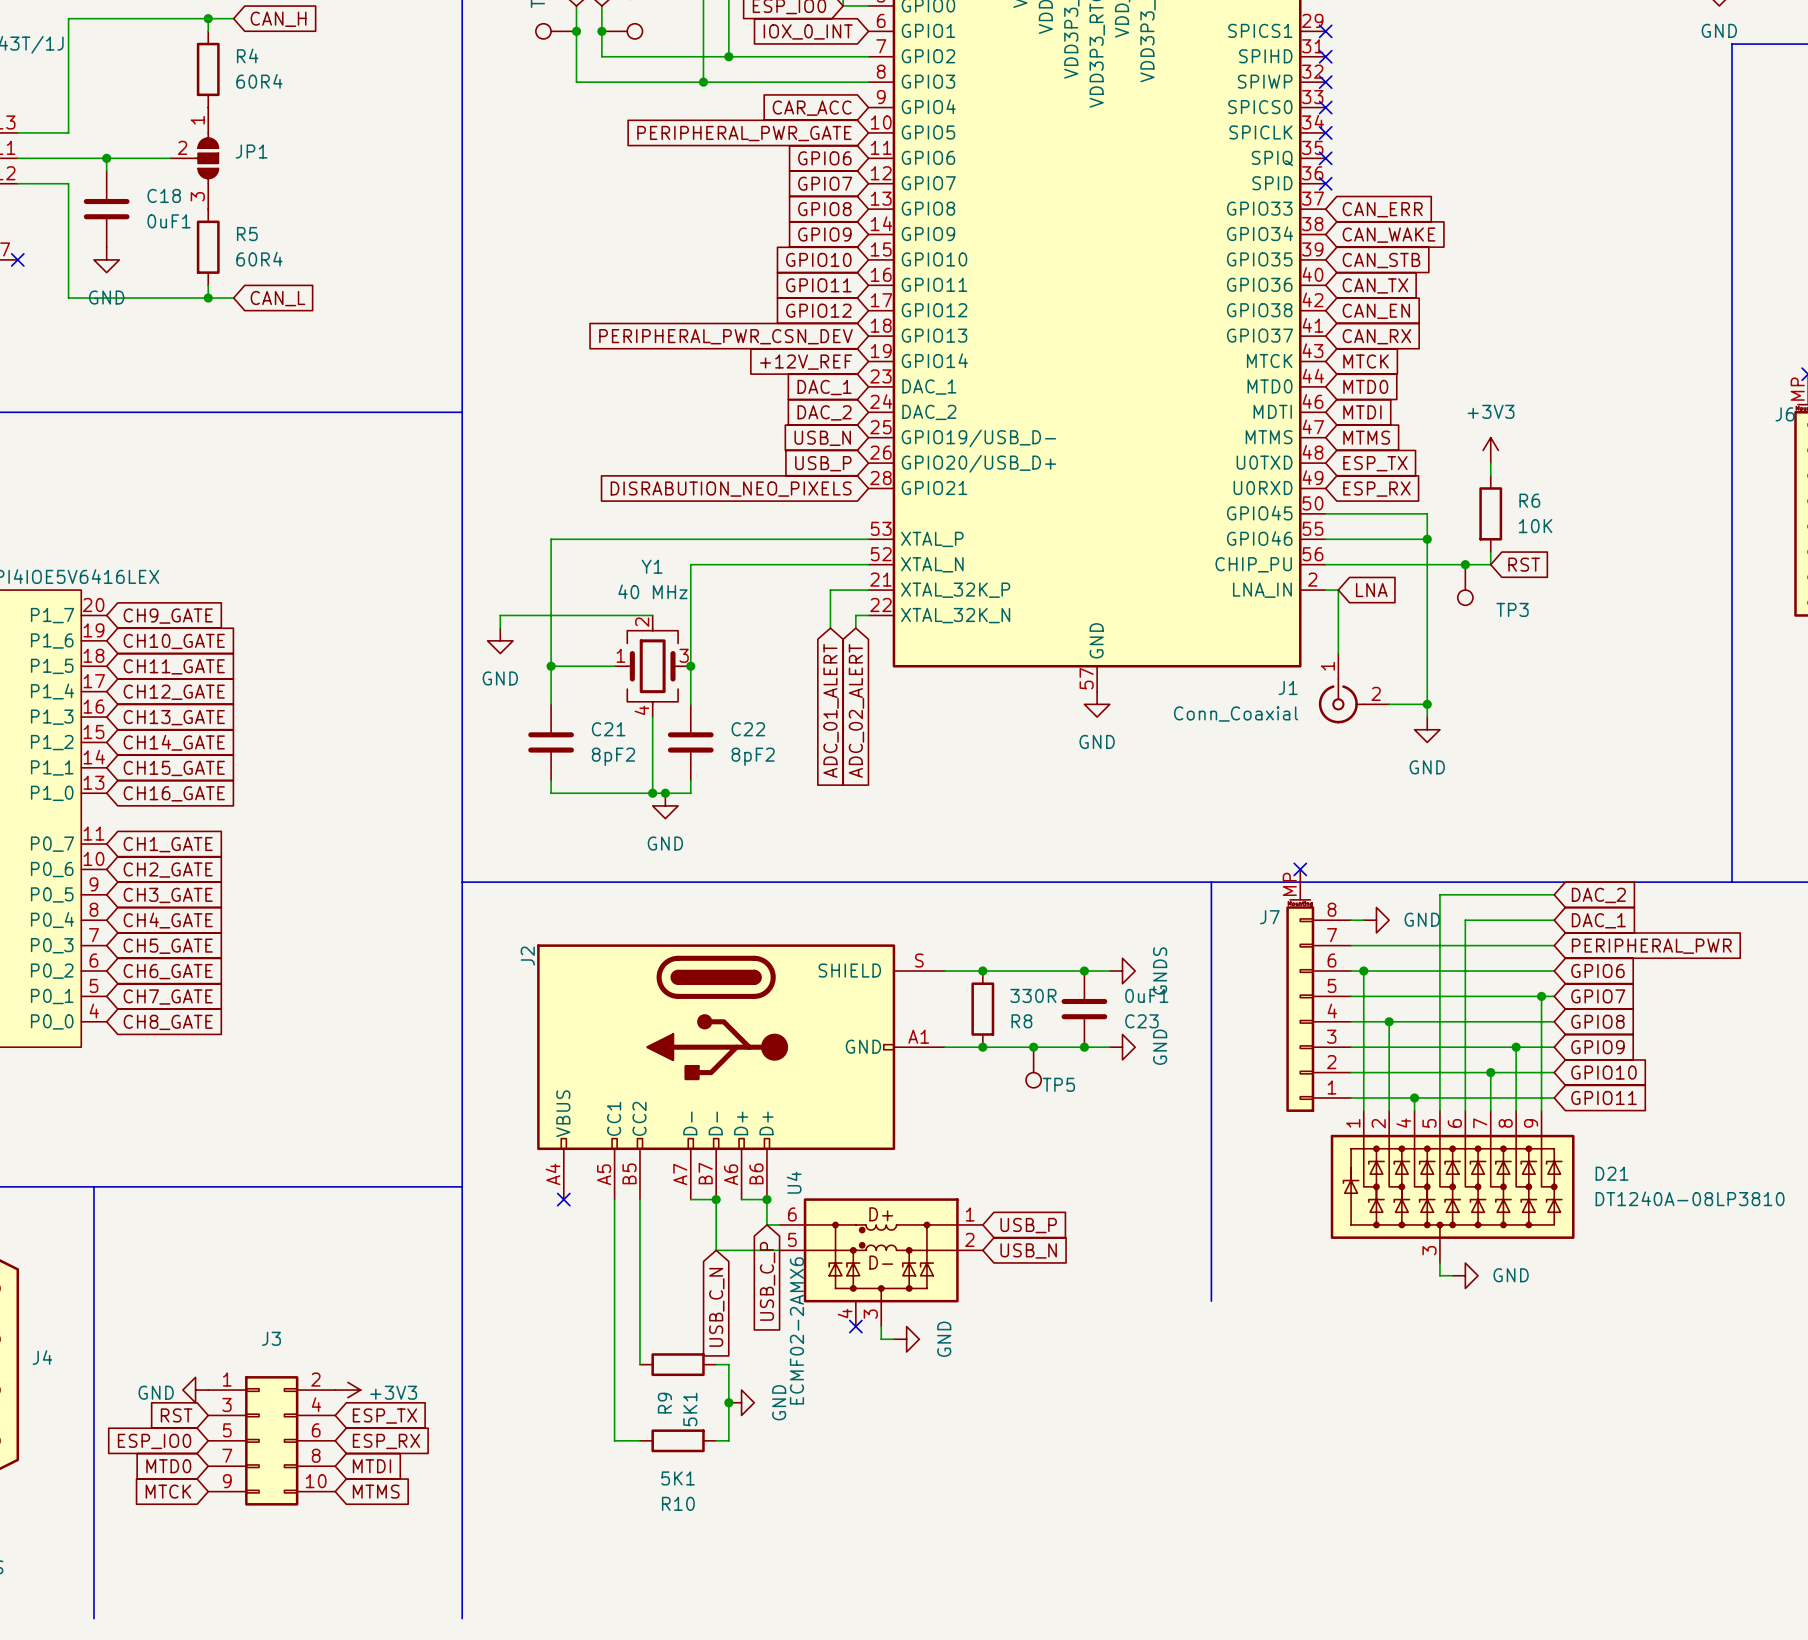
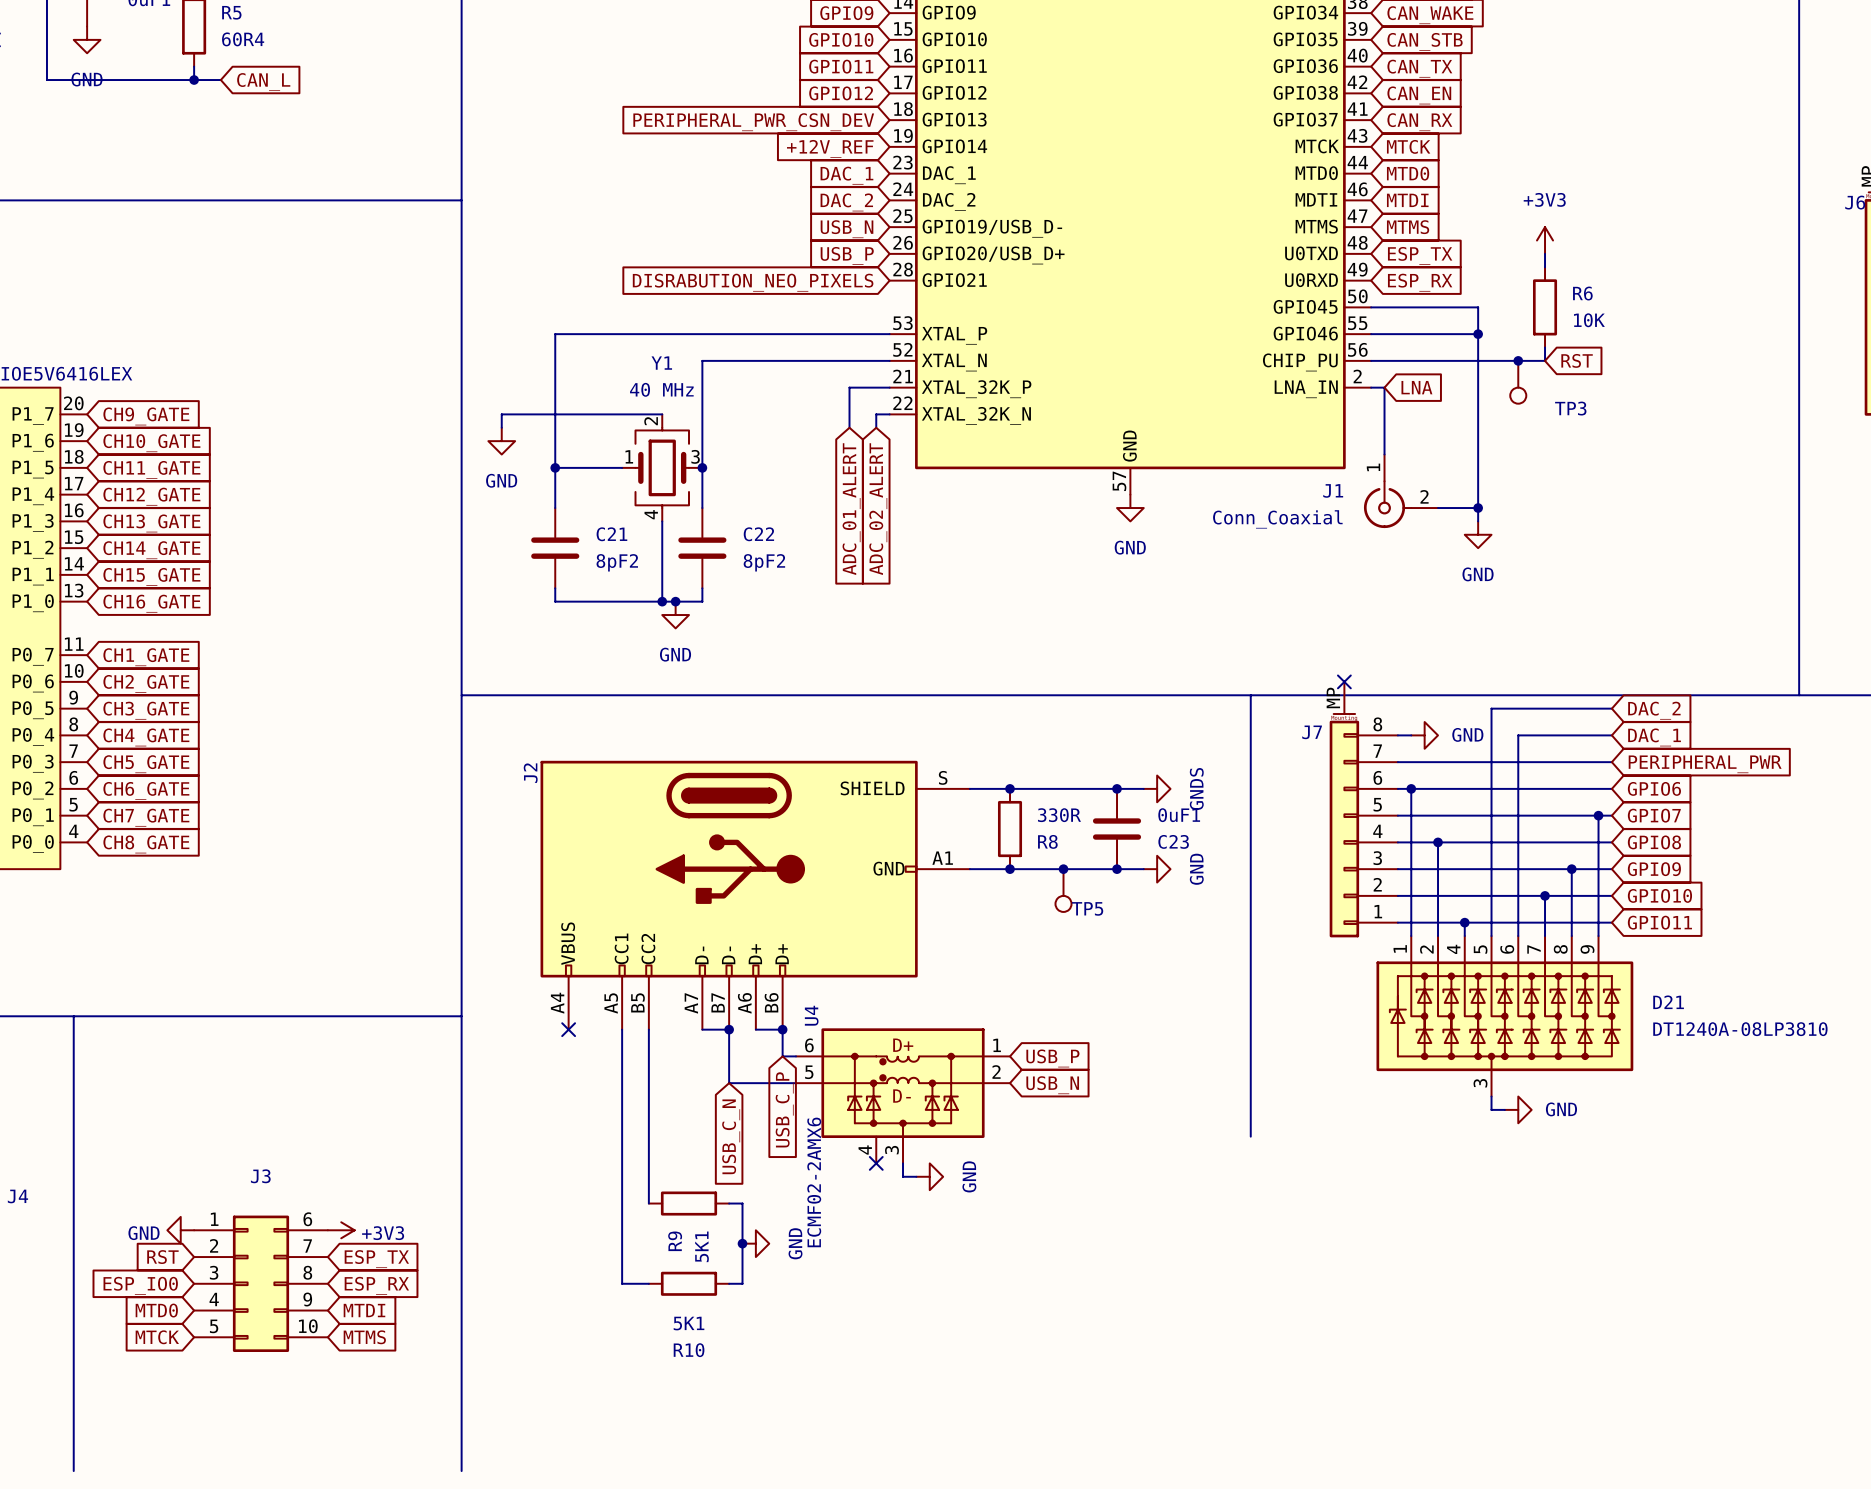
J3 pin number: 2 (315, 1379) -> 6 (307, 1219)
J3 pin number: 3 (226, 1404) -> 2 (214, 1245)
J3 pin number: 4 (316, 1404) -> 7 (307, 1246)
J3 pin number: 5 (227, 1430) -> 3 (214, 1272)
J3 pin number: 6 (316, 1430) -> 8 (307, 1272)
J3 pin number: 7 (227, 1455) -> 4 (214, 1299)
J3 pin number: 8 (316, 1455) -> 9 (307, 1299)
J3 pin number: 9 (227, 1481) -> 5 (214, 1326)

